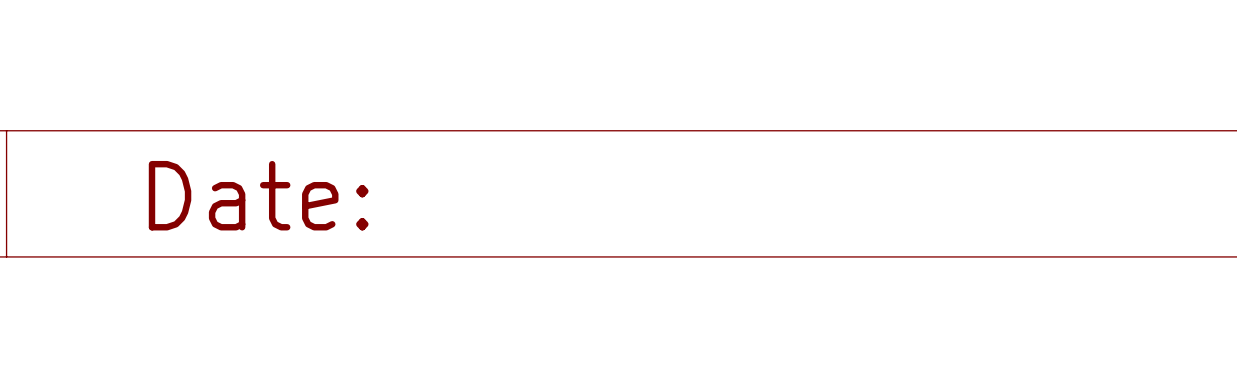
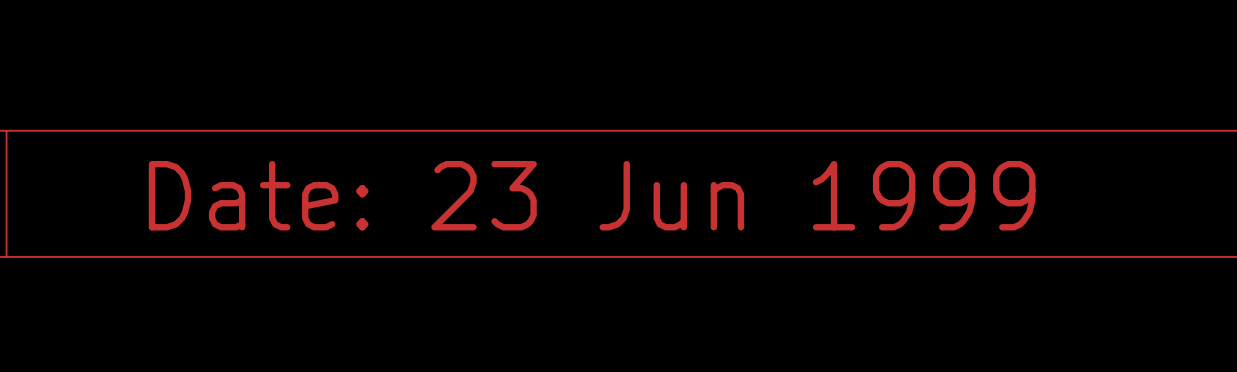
title block: Date: (258, 195) -> Date: 23 Jun 1999 (592, 195)

